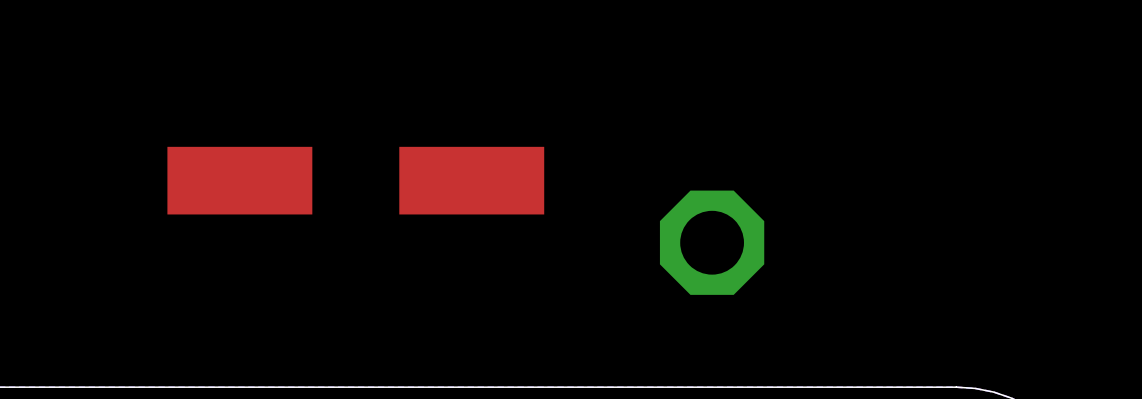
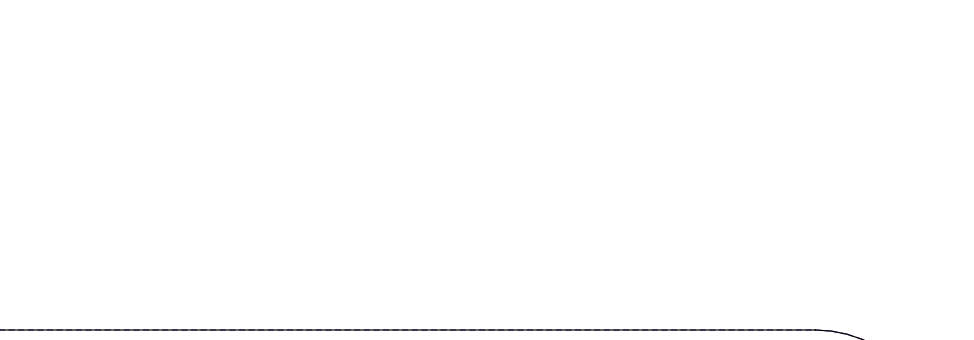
part: (355, 180) -> none
part: (712, 242) -> none

